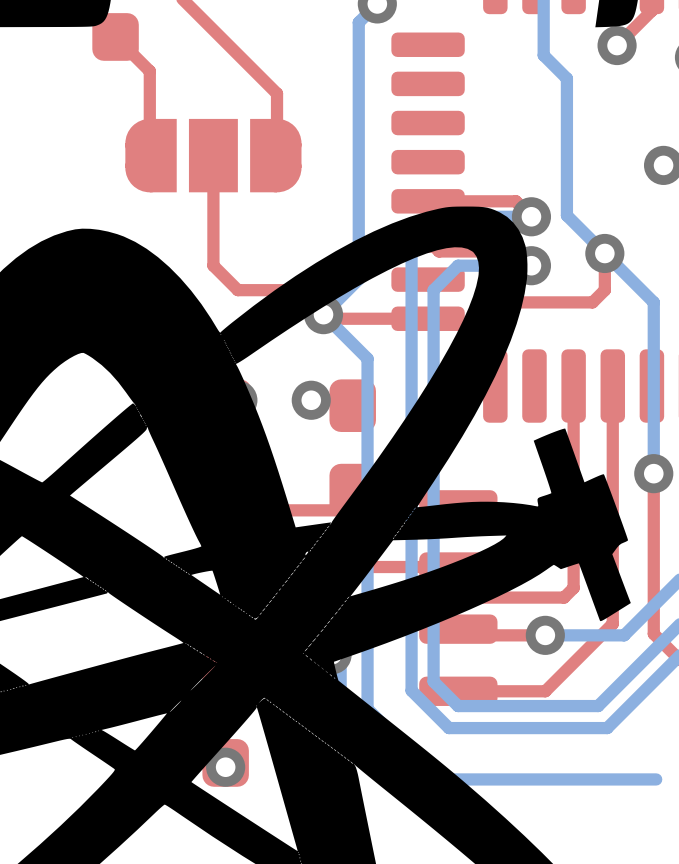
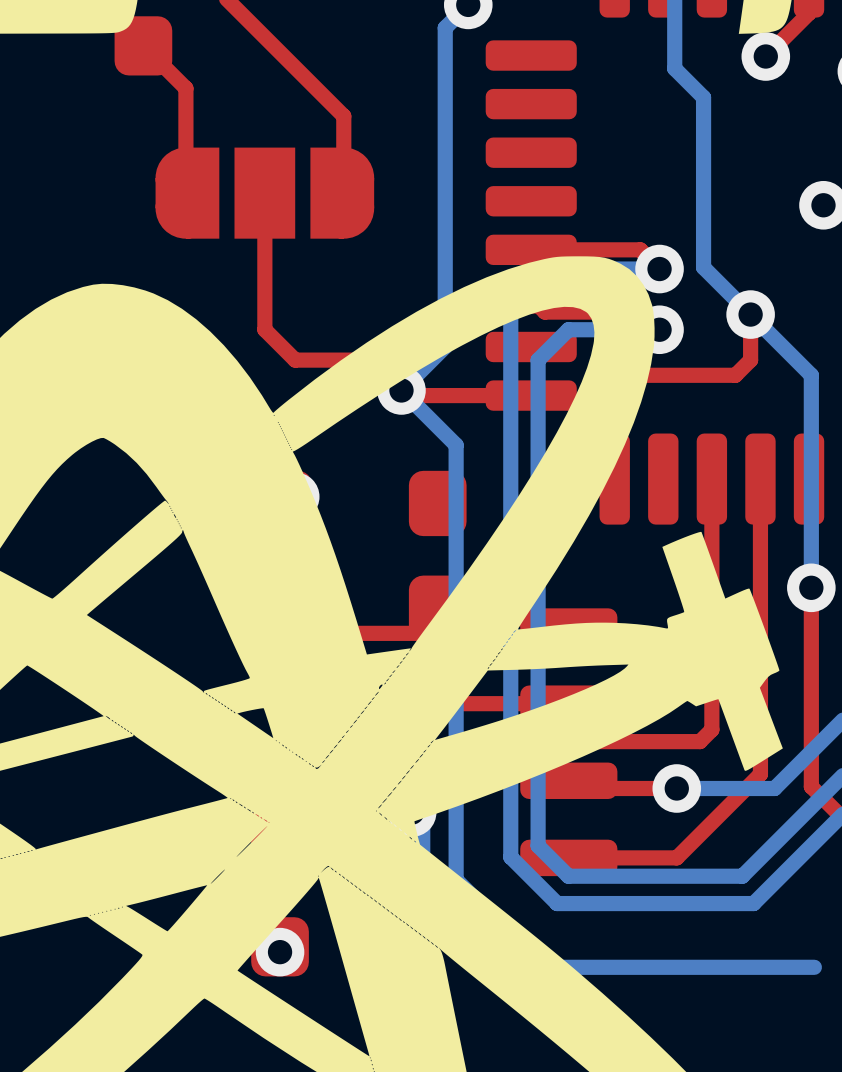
via: (311, 400) -> none

